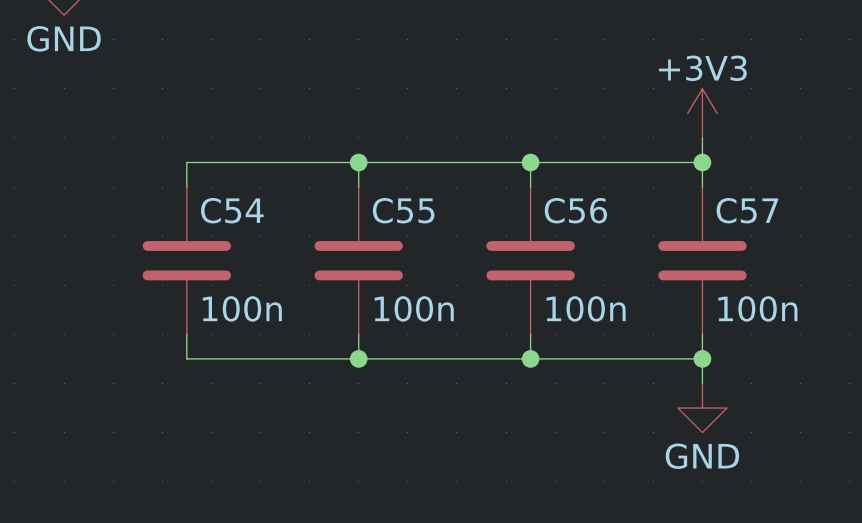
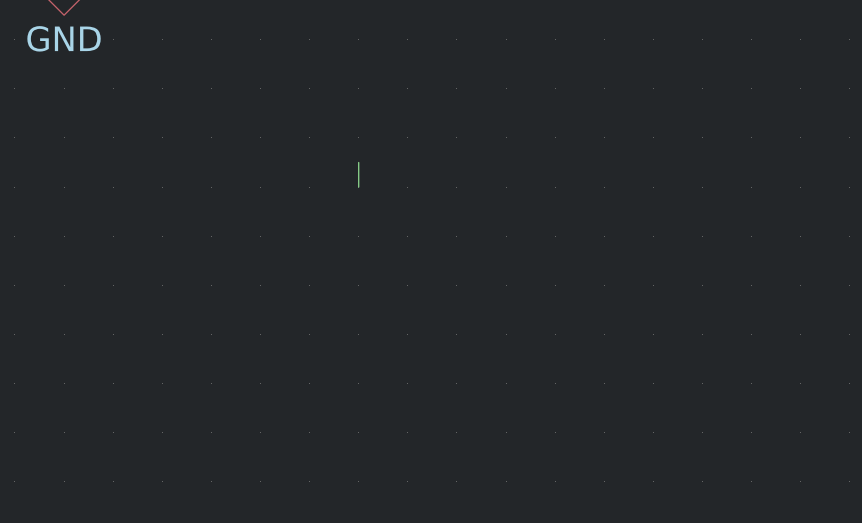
power symbol: +3V3 (702, 113) -> none
wire: (702, 137) (702, 187) -> none
junction: (358, 162) -> none
wire: (530, 162) (530, 187) -> none
junction: (530, 162) -> none
wire: (702, 162) (186, 162) (186, 187) -> none
junction: (702, 162) -> none
C54: 100n (186, 260) -> none
C55: 100n (358, 260) -> none
C56: 100n (530, 260) -> none
C57: 100n (702, 260) -> none
wire: (186, 334) (186, 358) (702, 358) -> none
wire: (358, 334) (358, 358) -> none
wire: (530, 334) (530, 358) -> none
wire: (702, 334) (702, 383) -> none
junction: (358, 358) -> none
junction: (530, 358) -> none
junction: (702, 358) -> none
power symbol: GND (702, 408) -> none

